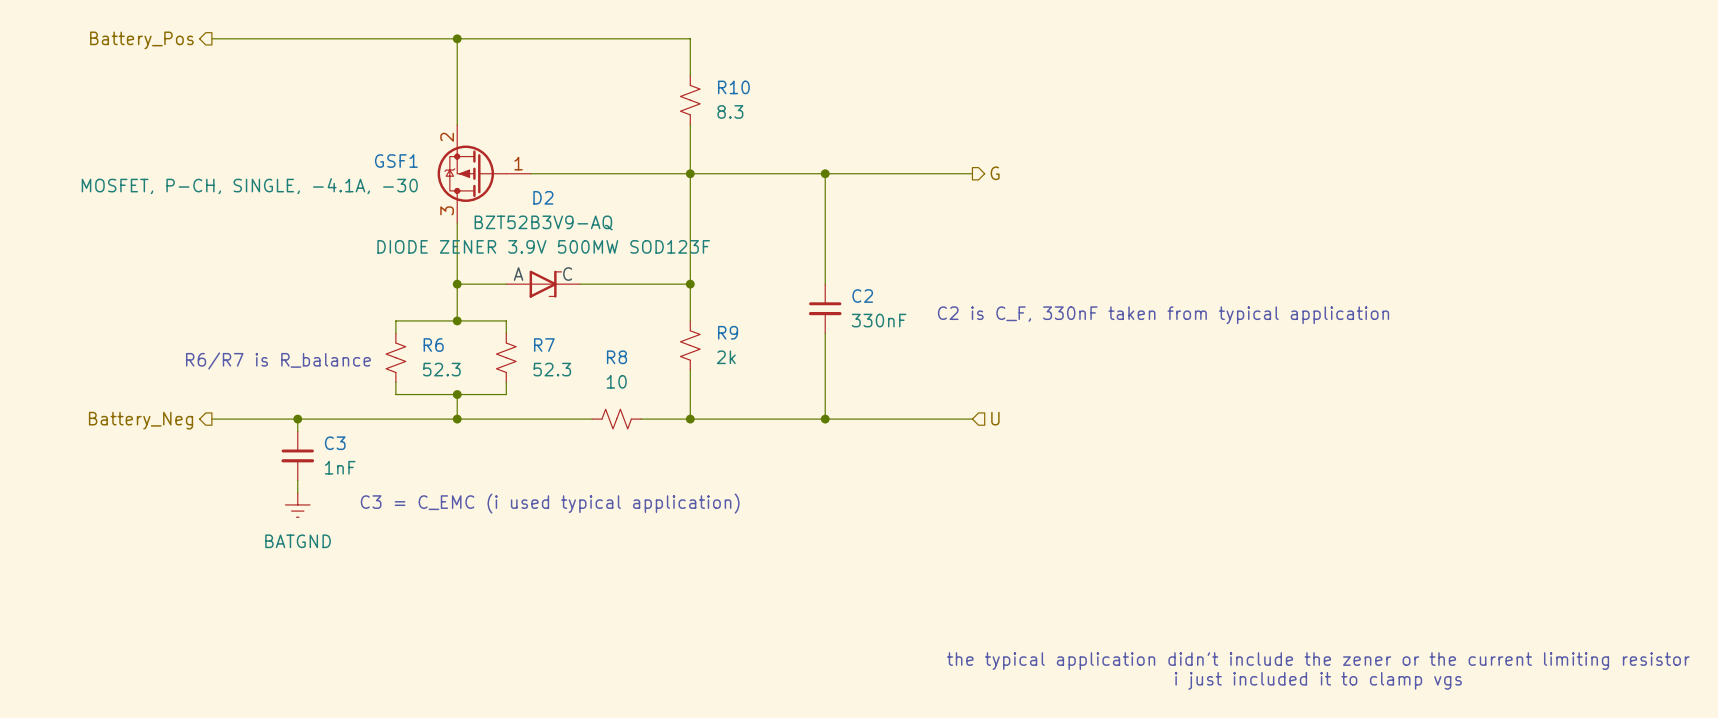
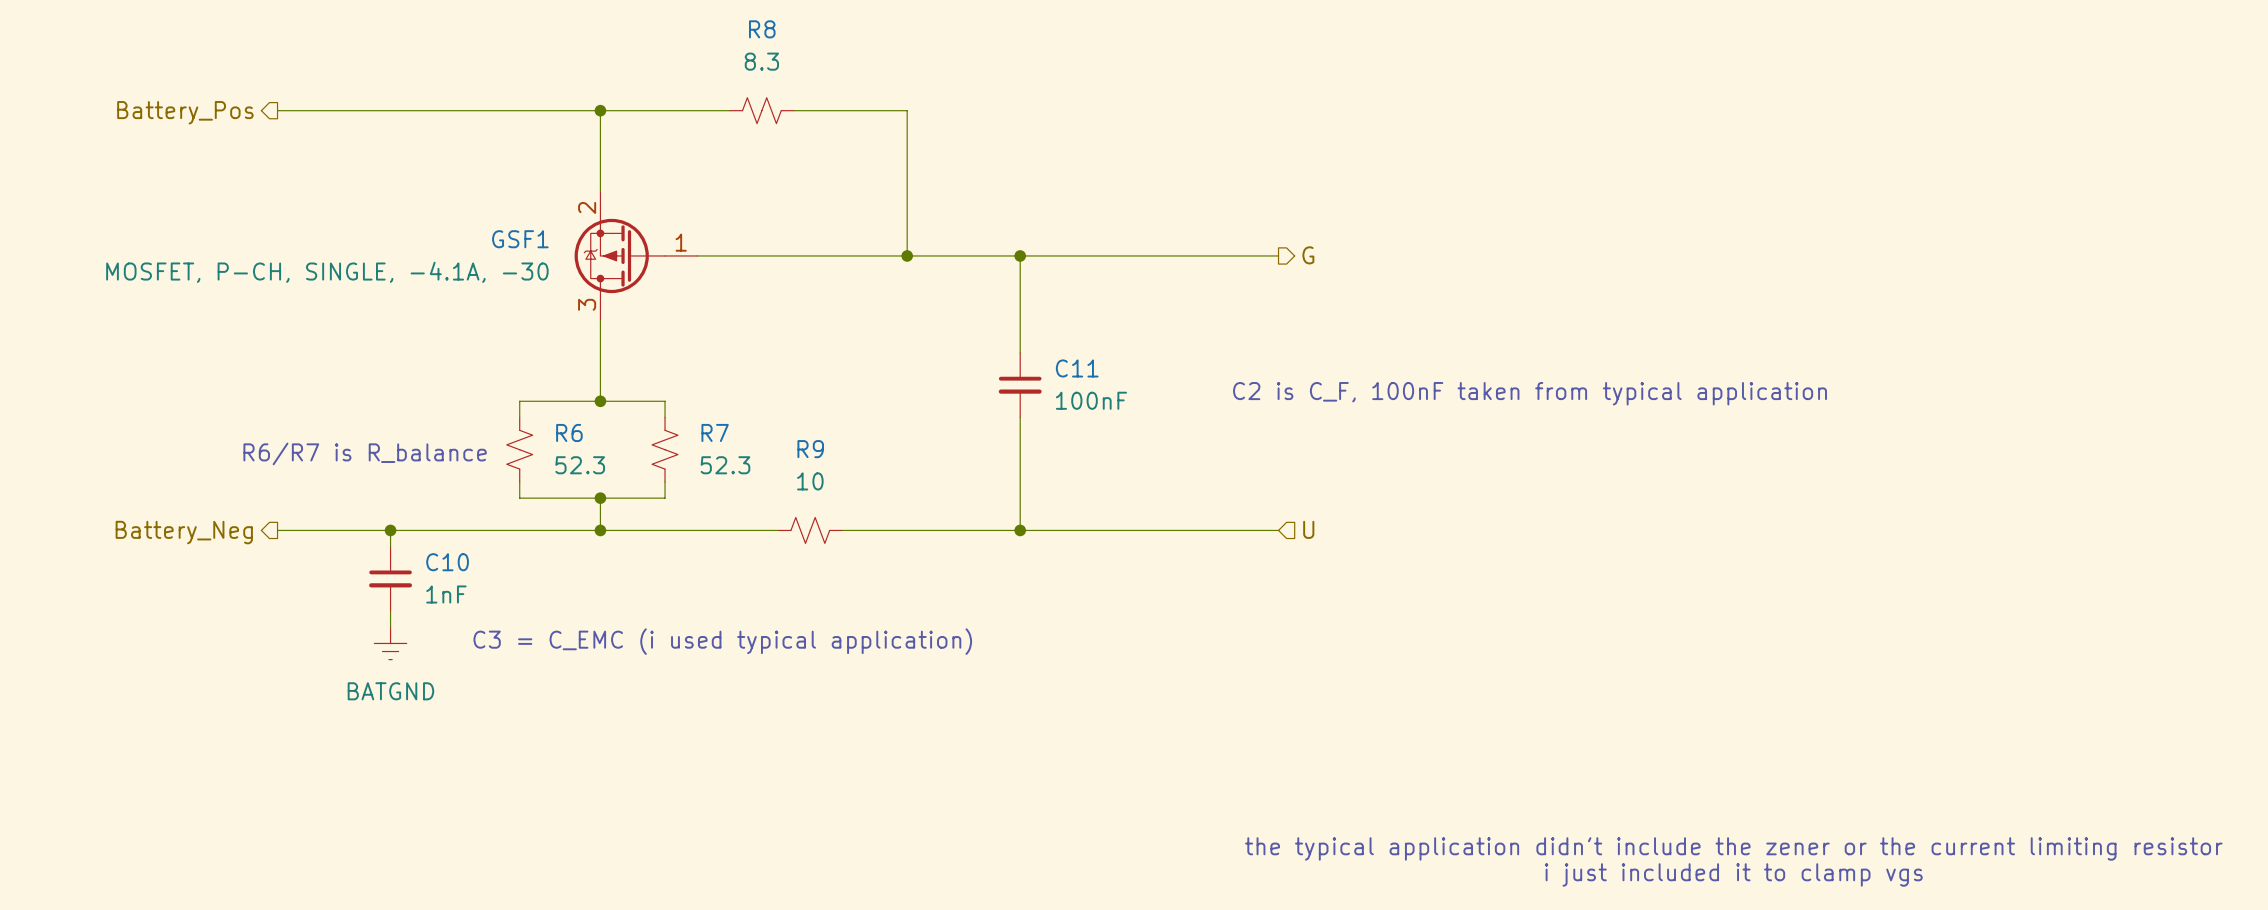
wire: (211, 38) (690, 38) (690, 75) -> none
wire: (457, 38) (457, 100) -> none
junction: (457, 38) -> none
hierarchical label position: Battery_Pos (141, 40) -> Battery_Pos (185, 112)
wire: none -> (277, 110) (729, 110)
junction: none -> (600, 110)
R8: none -> 8.3 (761, 110)
wire: none -> (794, 110) (907, 110) (907, 142)
R10: 8.3 (690, 100) -> none
GSF1 position: (484, 173) -> (635, 255)
wire: (530, 173) (972, 173) -> (697, 255) (1278, 255)
junction: (690, 173) -> none
wire: (825, 173) (825, 284) -> none
junction: (825, 173) -> none
hierarchical label position: G (995, 173) -> G (1308, 255)
wire: (690, 210) (690, 320) -> none
junction: none -> (907, 255)
wire: none -> (1020, 255) (1020, 352)
junction: none -> (1020, 255)
wire: (457, 284) (506, 284) -> none
junction: (457, 284) -> none
D2: BZT52B3V9-AQ (543, 284) -> none
wire: (579, 284) (690, 284) -> none
junction: (690, 284) -> none
C11: none -> 100nF (1020, 385)
C2: 330nF (825, 308) -> none
text: C2 is C_F, 330nF taken from typical application (1163, 315) -> C2 is C_F, 100nF taken from typical application (1530, 393)
wire: (825, 333) (825, 419) -> (1020, 417) (1020, 530)
R9: 2k (690, 345) -> none
R8 name: R8 (616, 357) -> R9 (810, 449)
wire: (690, 370) (690, 419) -> none
junction: (690, 419) -> none
junction: none -> (1020, 530)
junction: (825, 419) -> none
C3 name: C3 (335, 443) -> C10 (447, 562)

